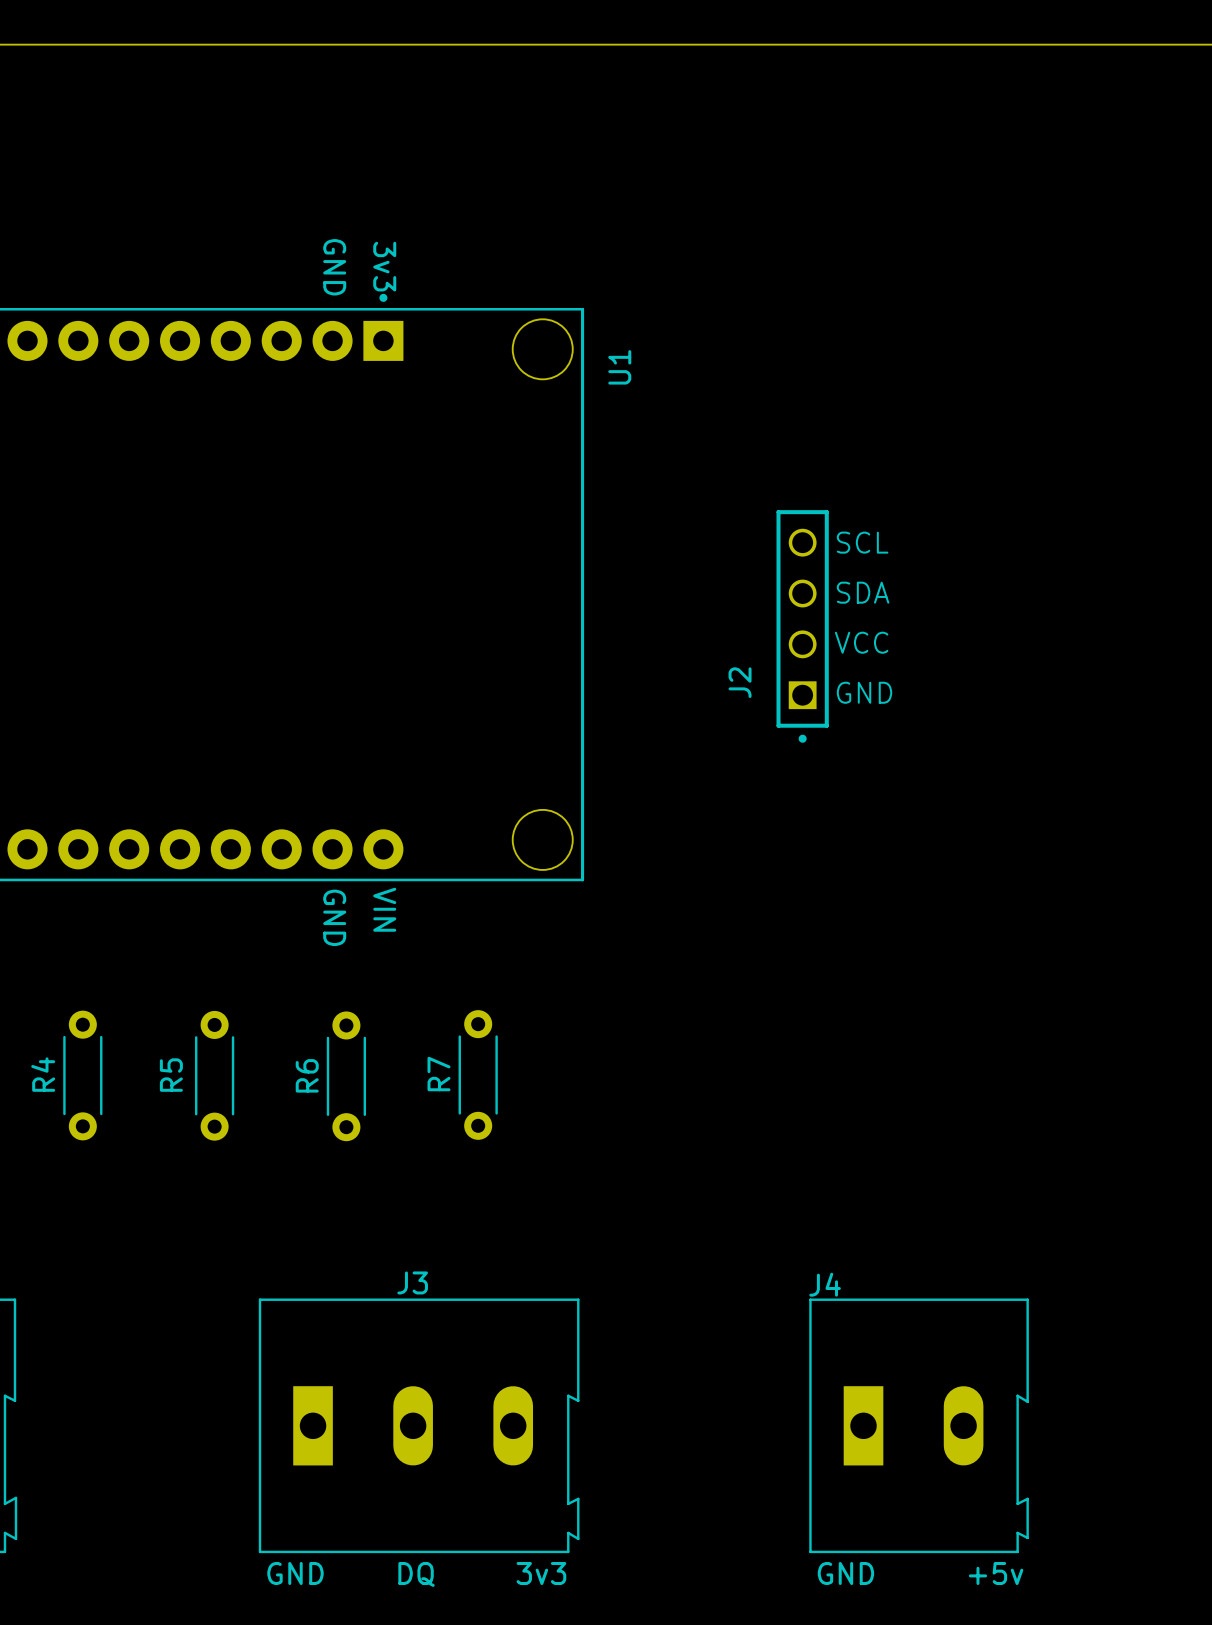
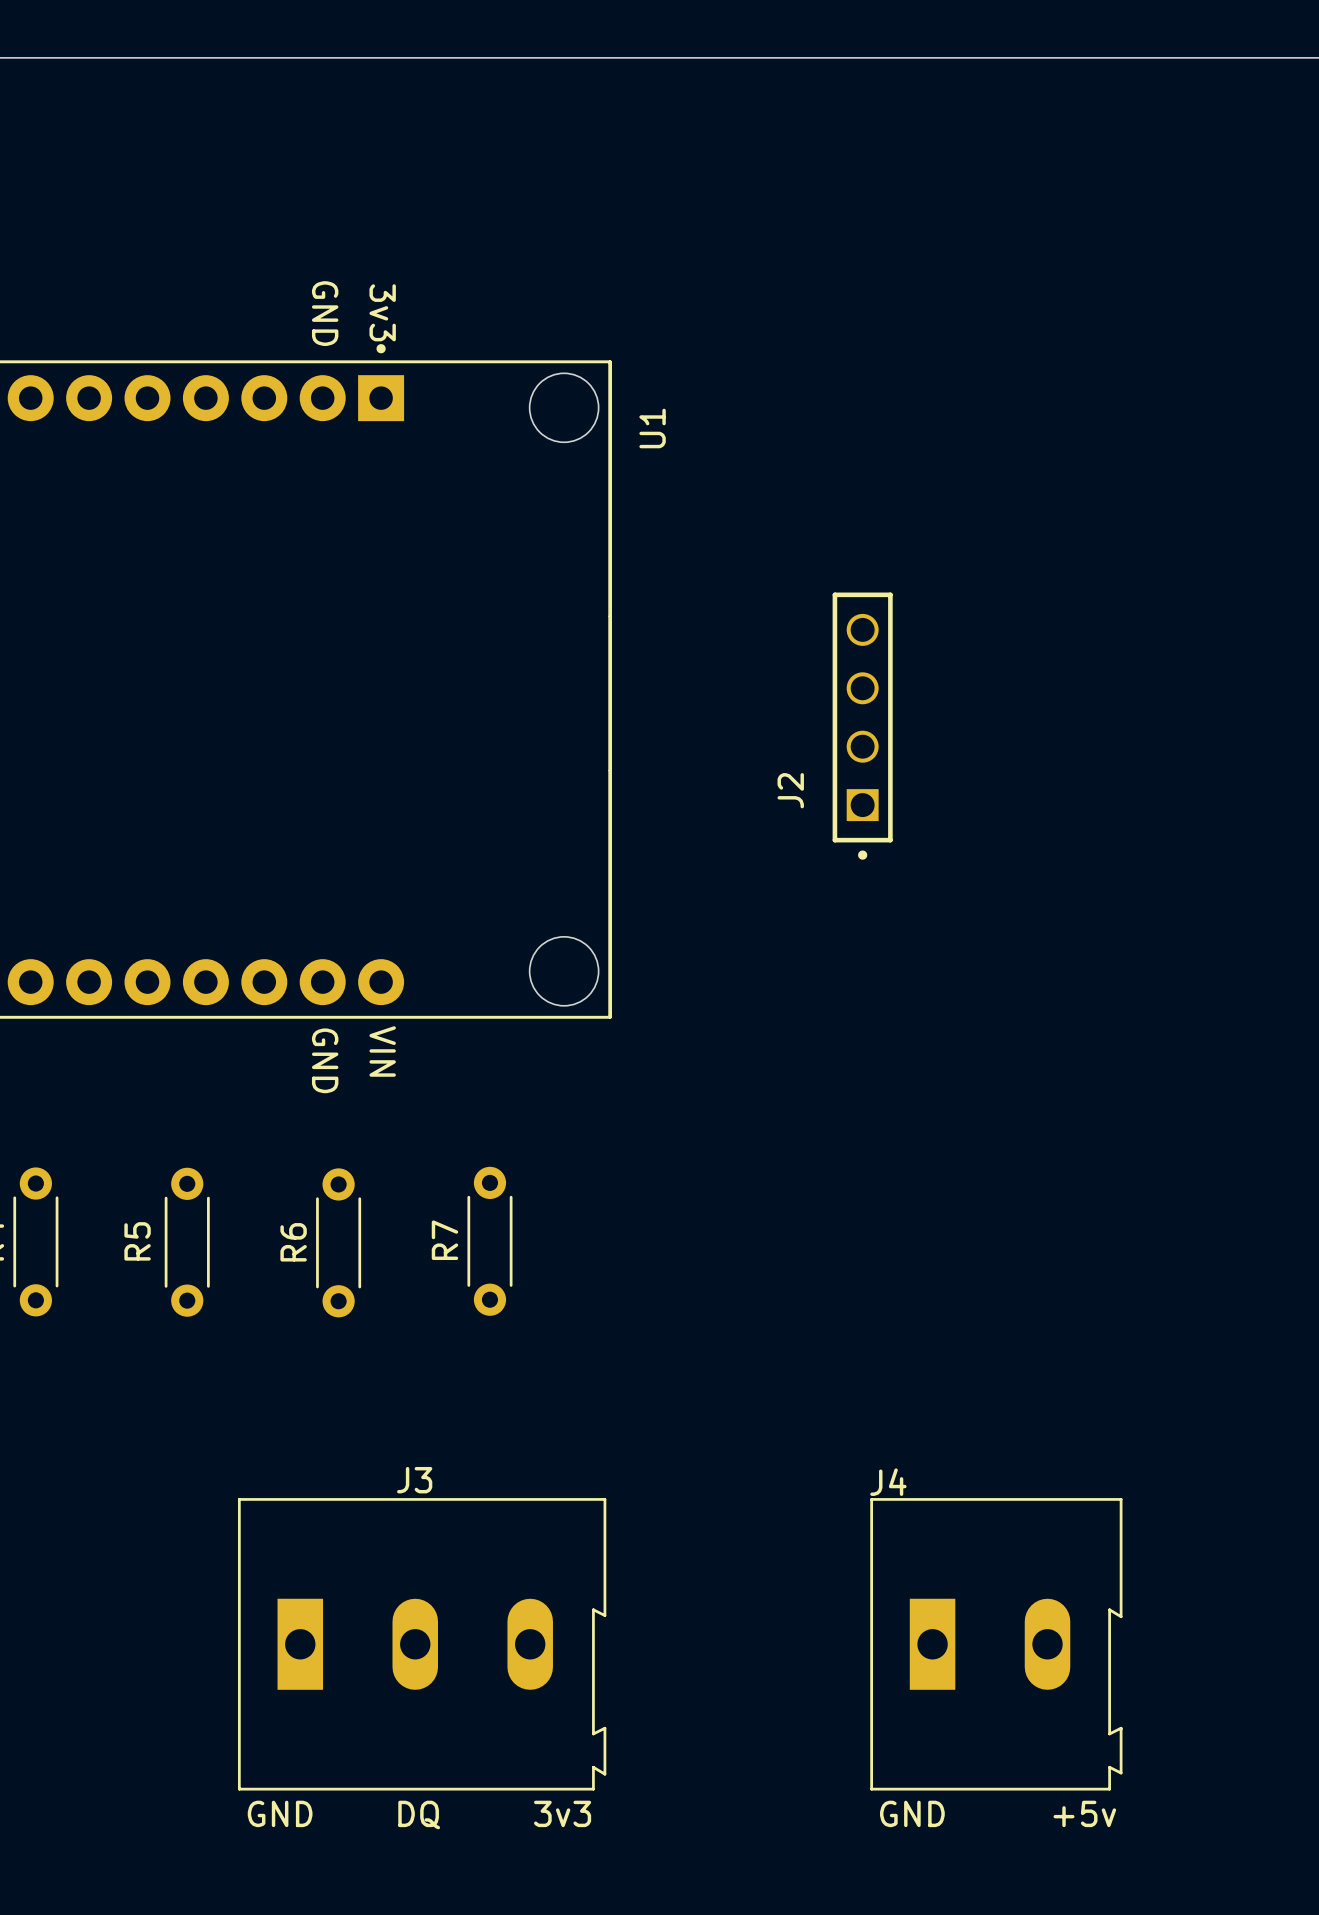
text: SCL (862, 542) -> none
text: SDA (863, 592) -> none
text: VCC (861, 642) -> none
text: GND (864, 692) -> none

